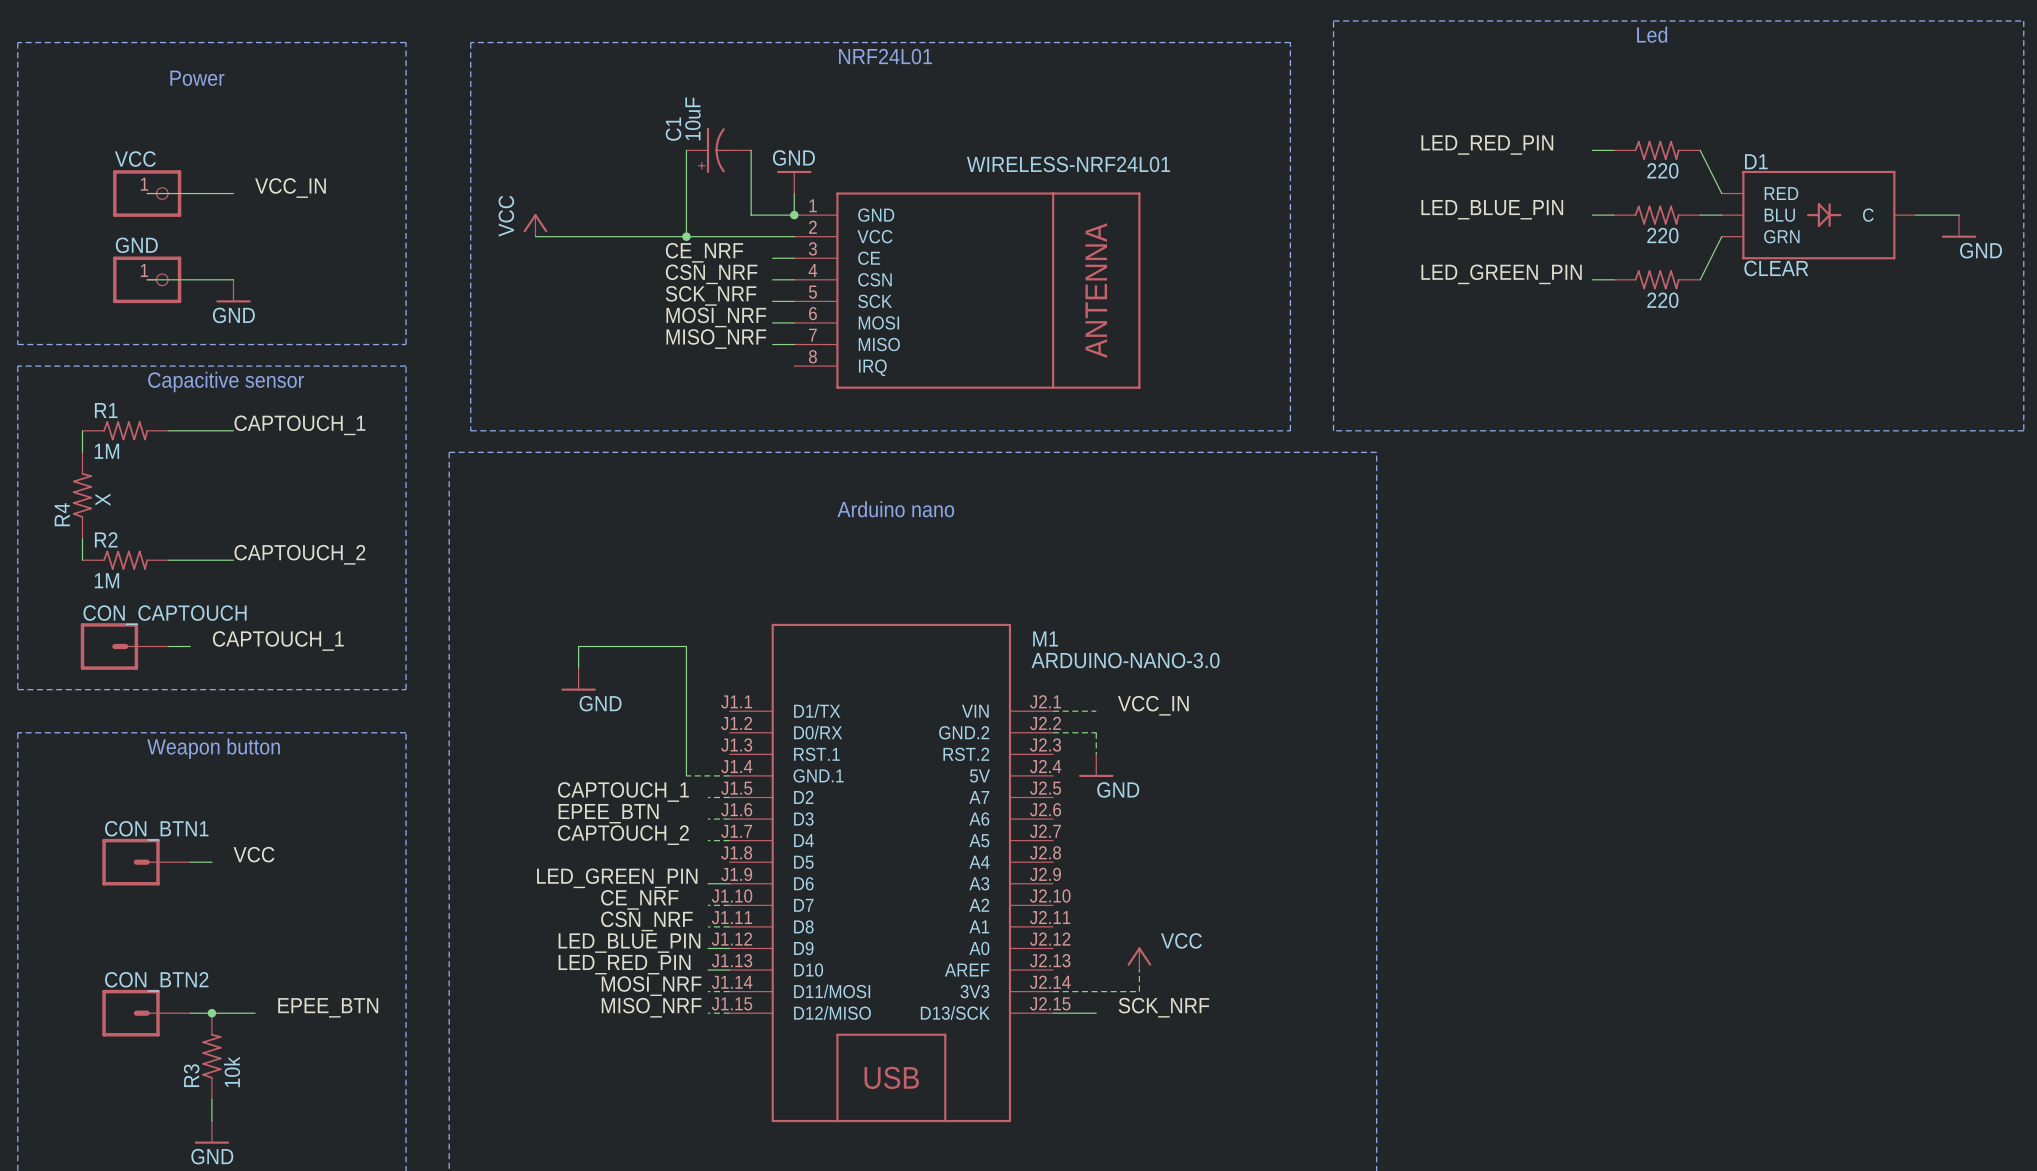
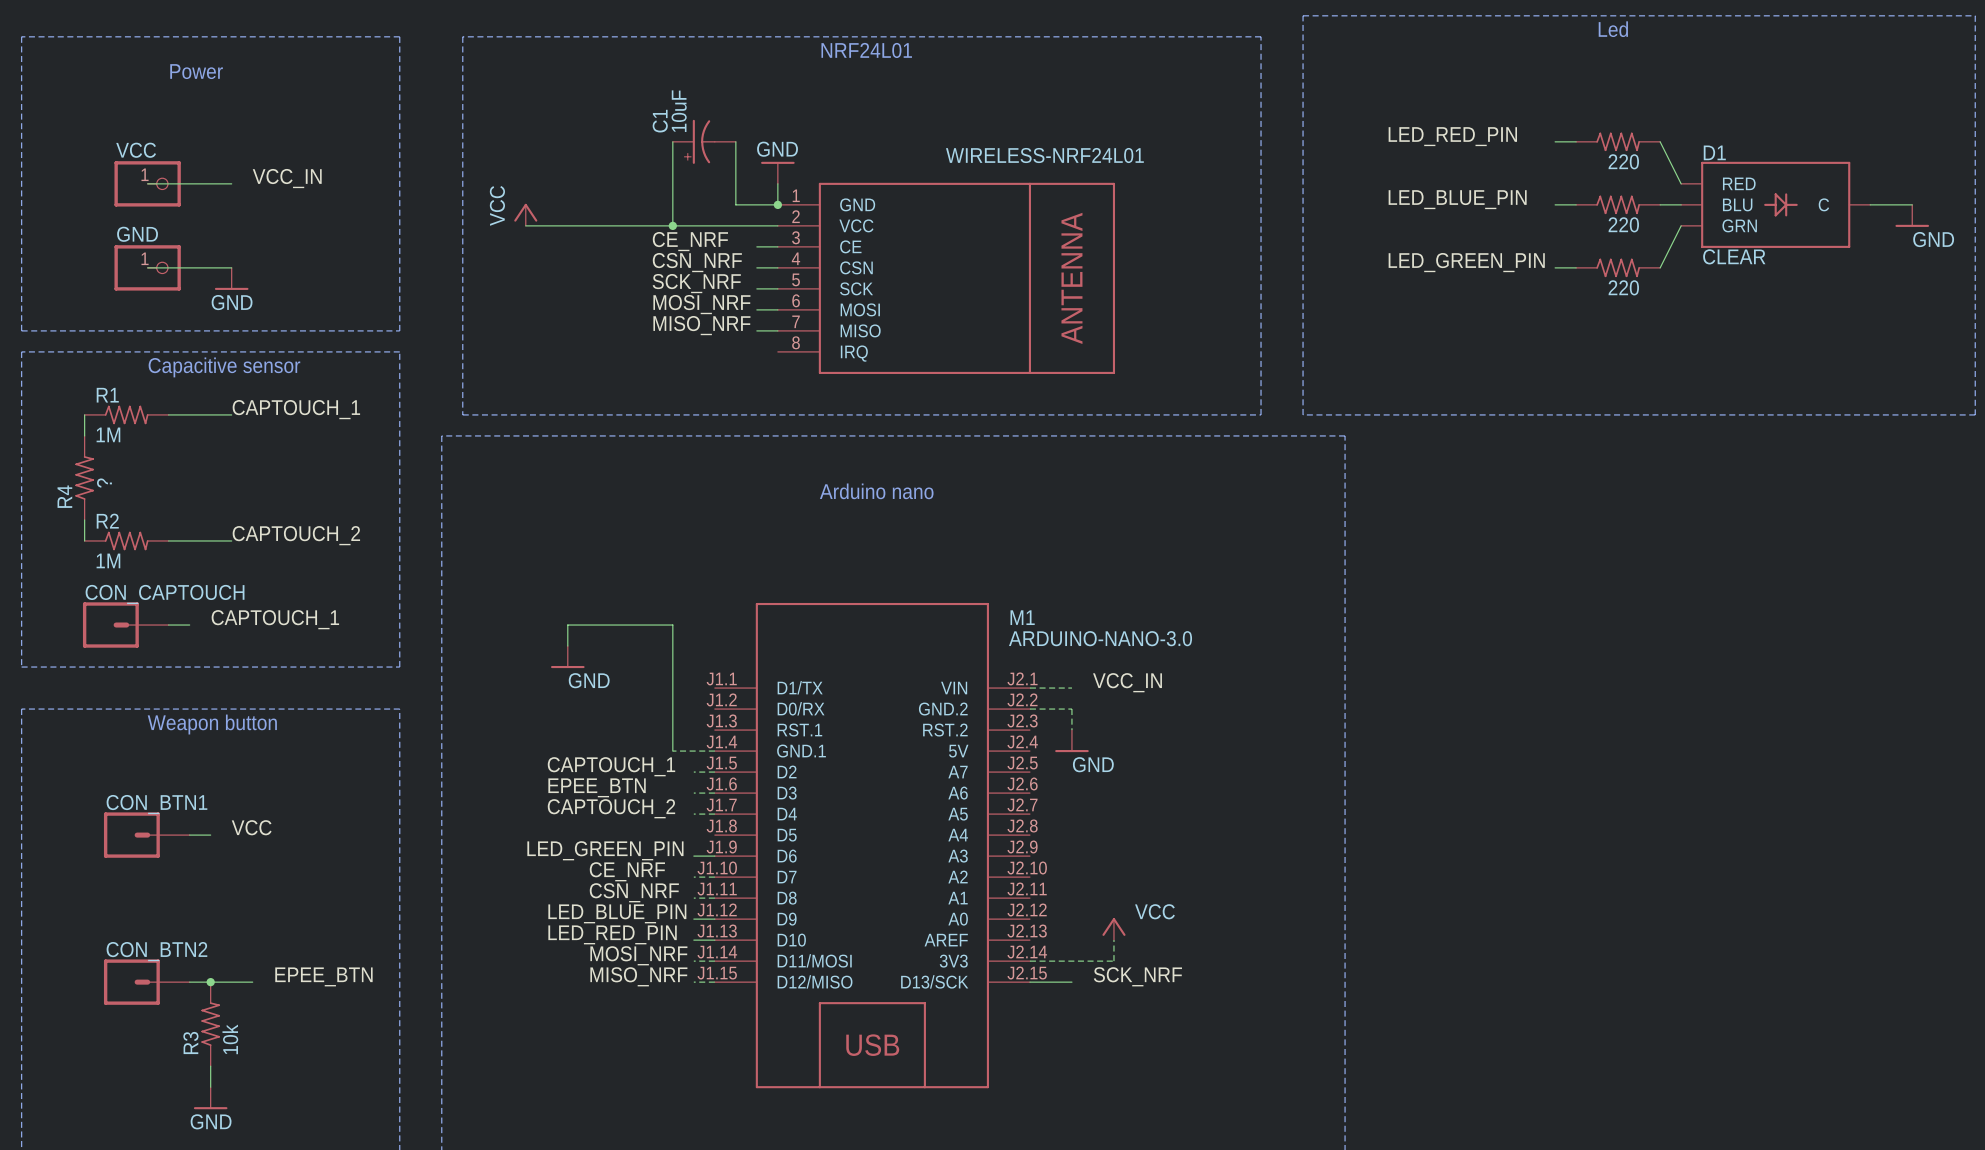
R4 value: X (102, 499) -> ? (104, 483)

